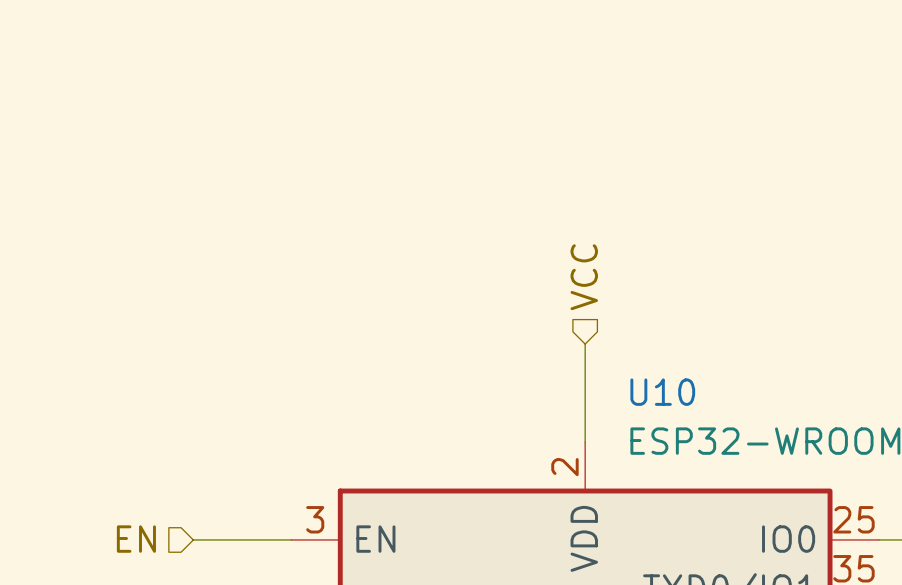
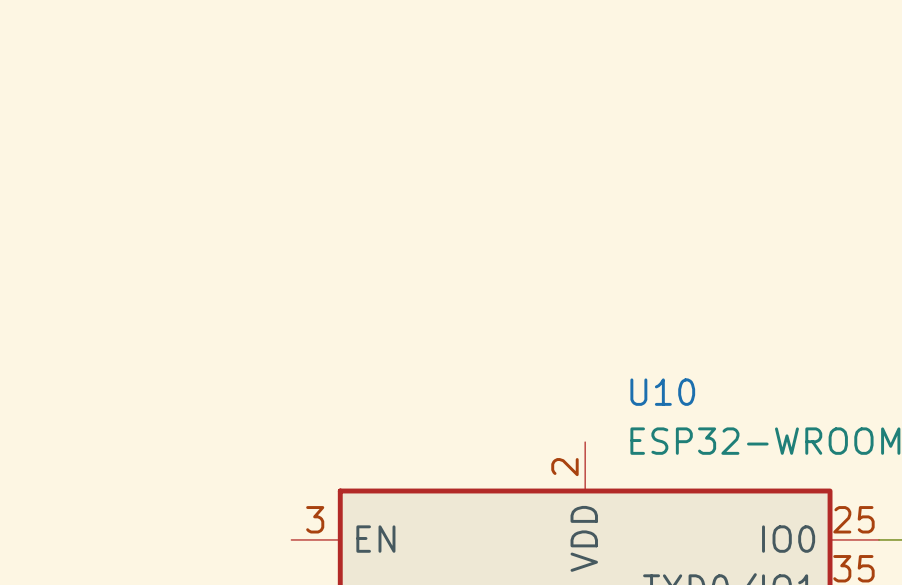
hierarchical label: VCC (584, 277) -> none
wire: (585, 344) (585, 442) -> none
hierarchical label: EN (136, 539) -> none
wire: (193, 539) (291, 539) -> none

